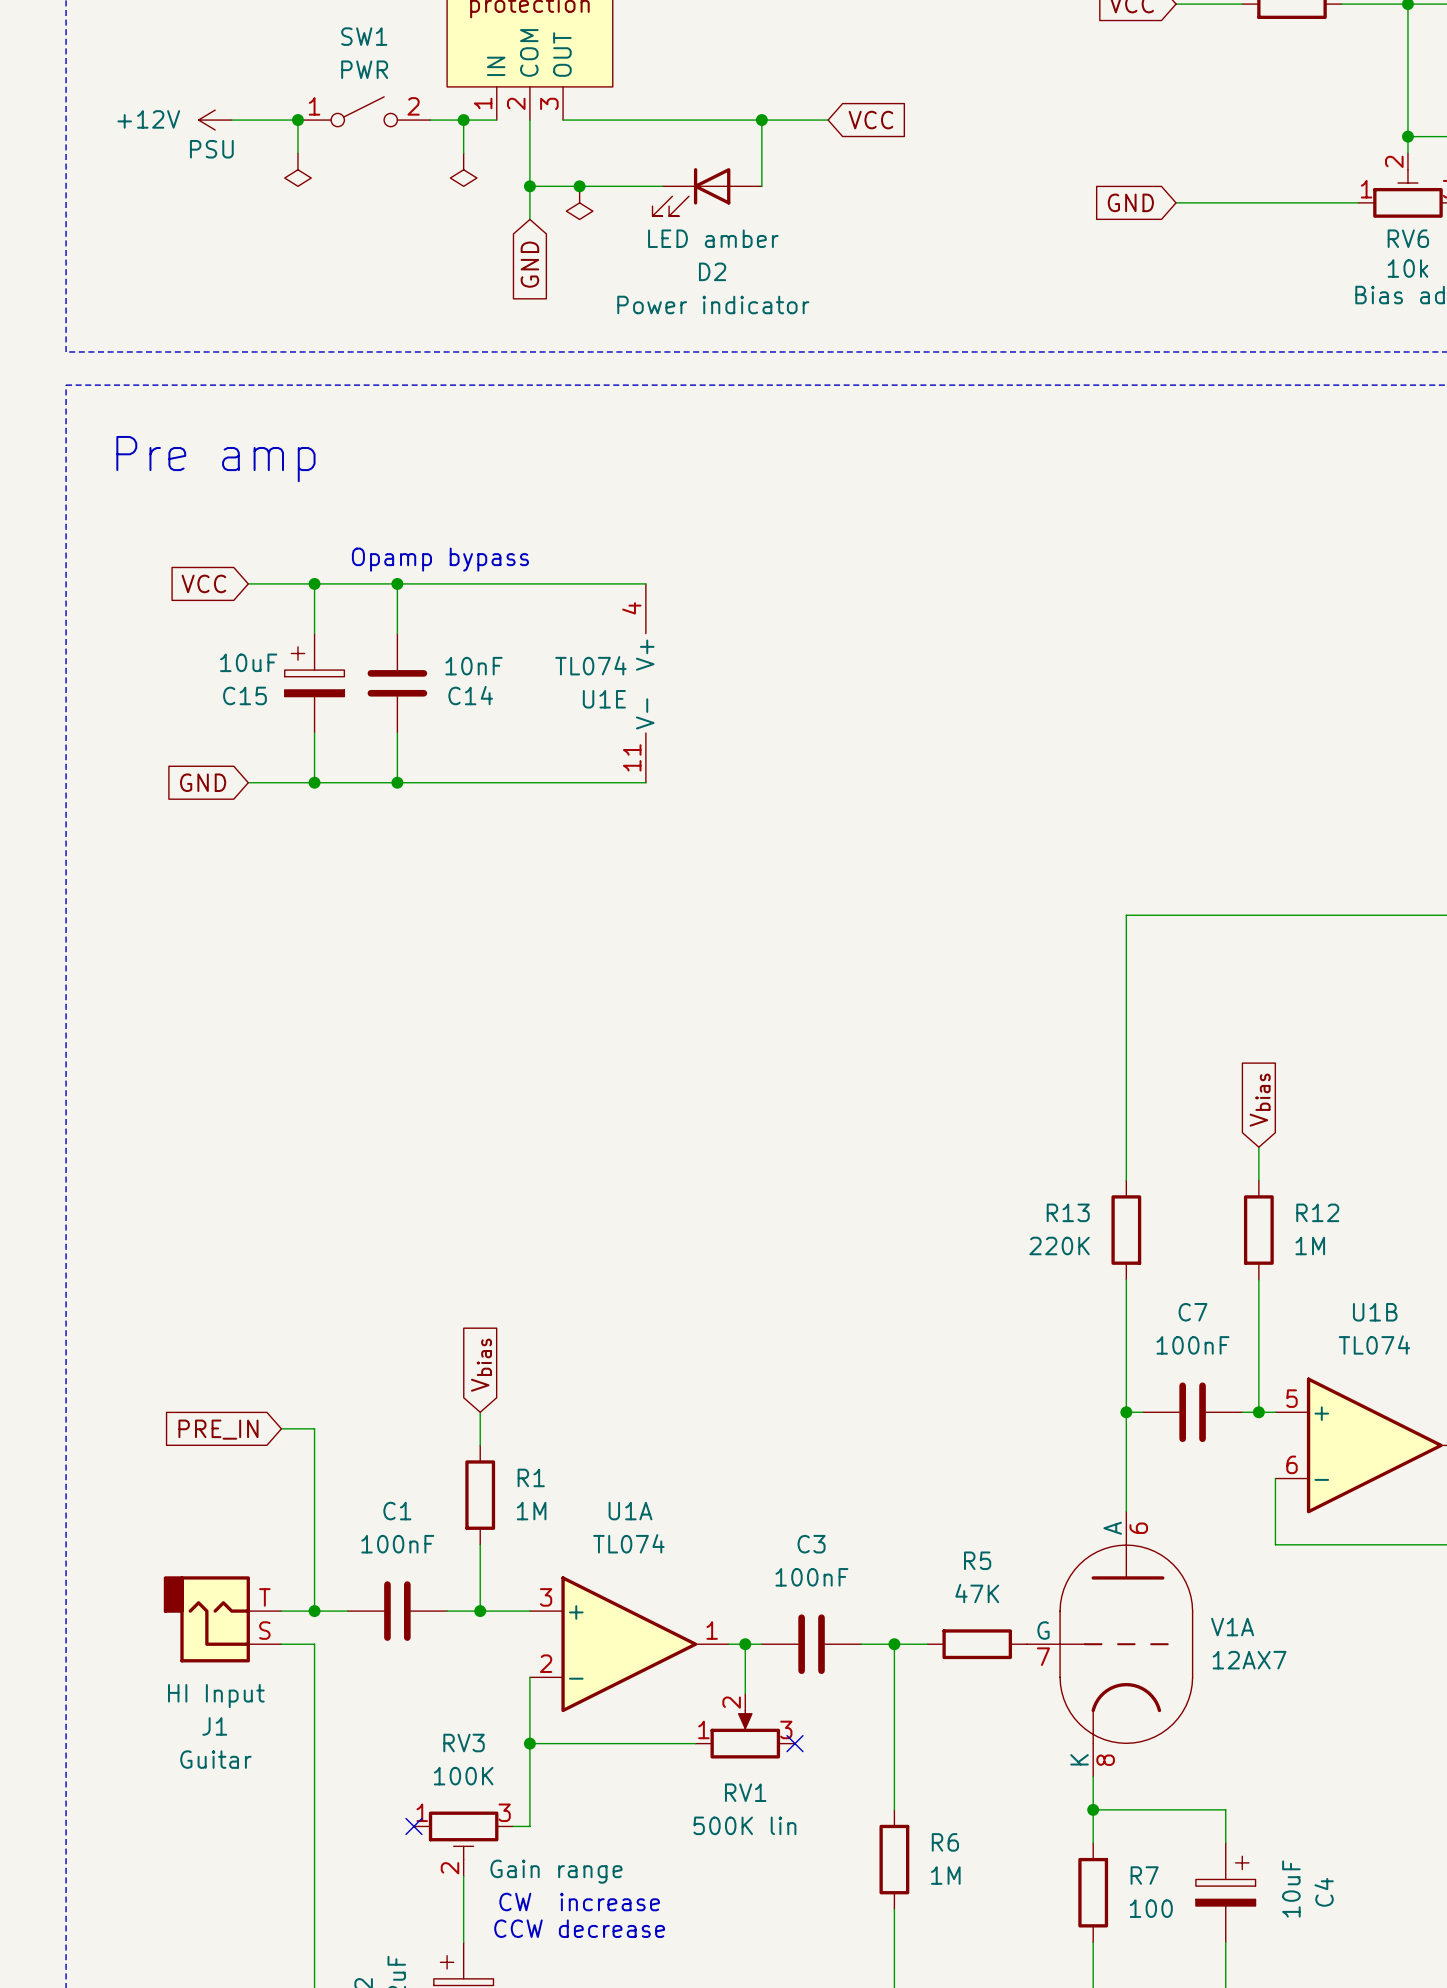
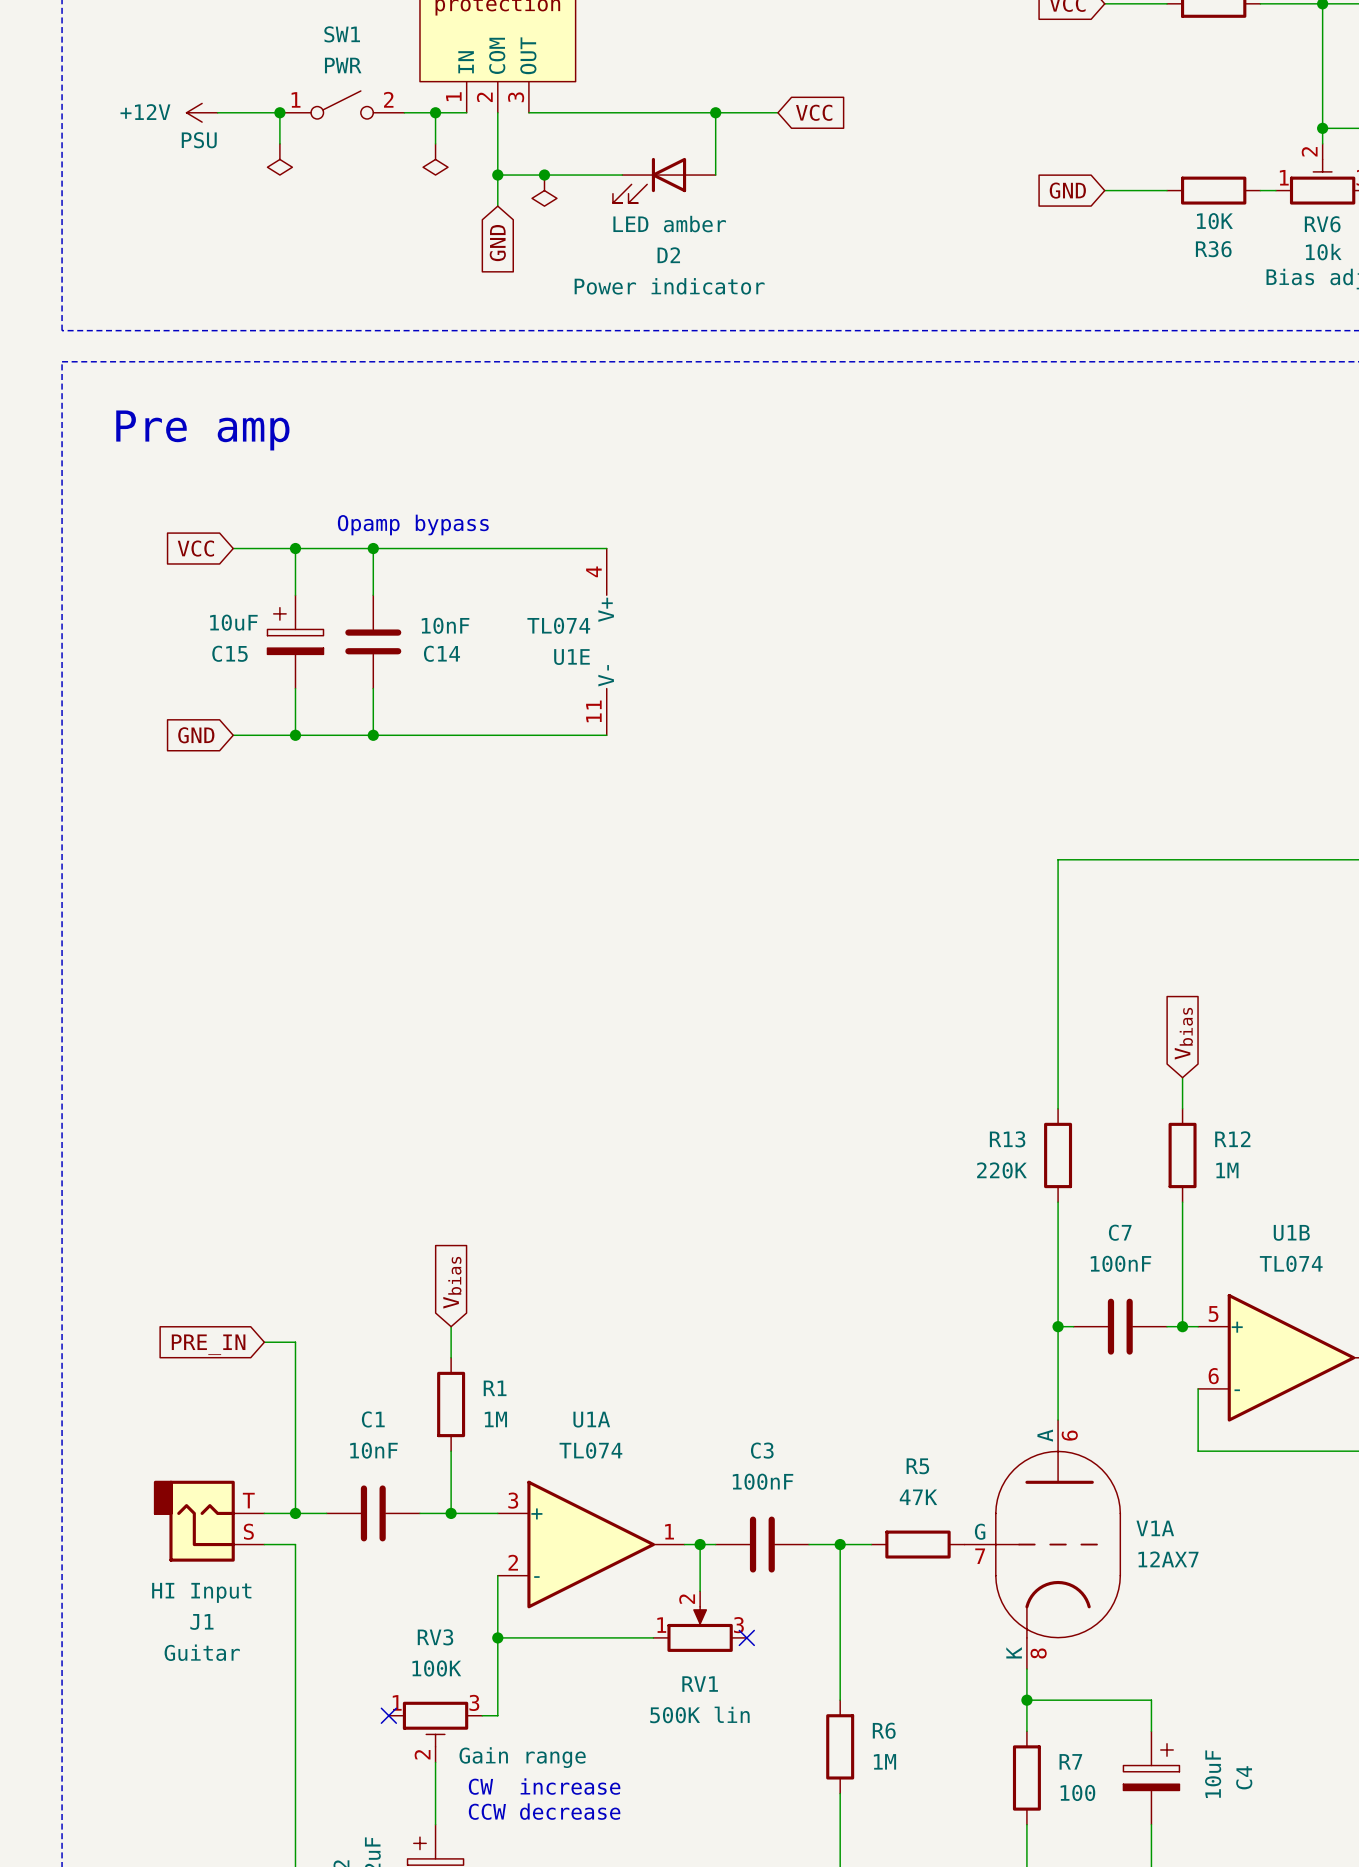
wire: (1242, 202) (1341, 202) -> none
R36: none -> 10K (1213, 190)
C1 value: 100nF (397, 1544) -> 10nF (373, 1450)

